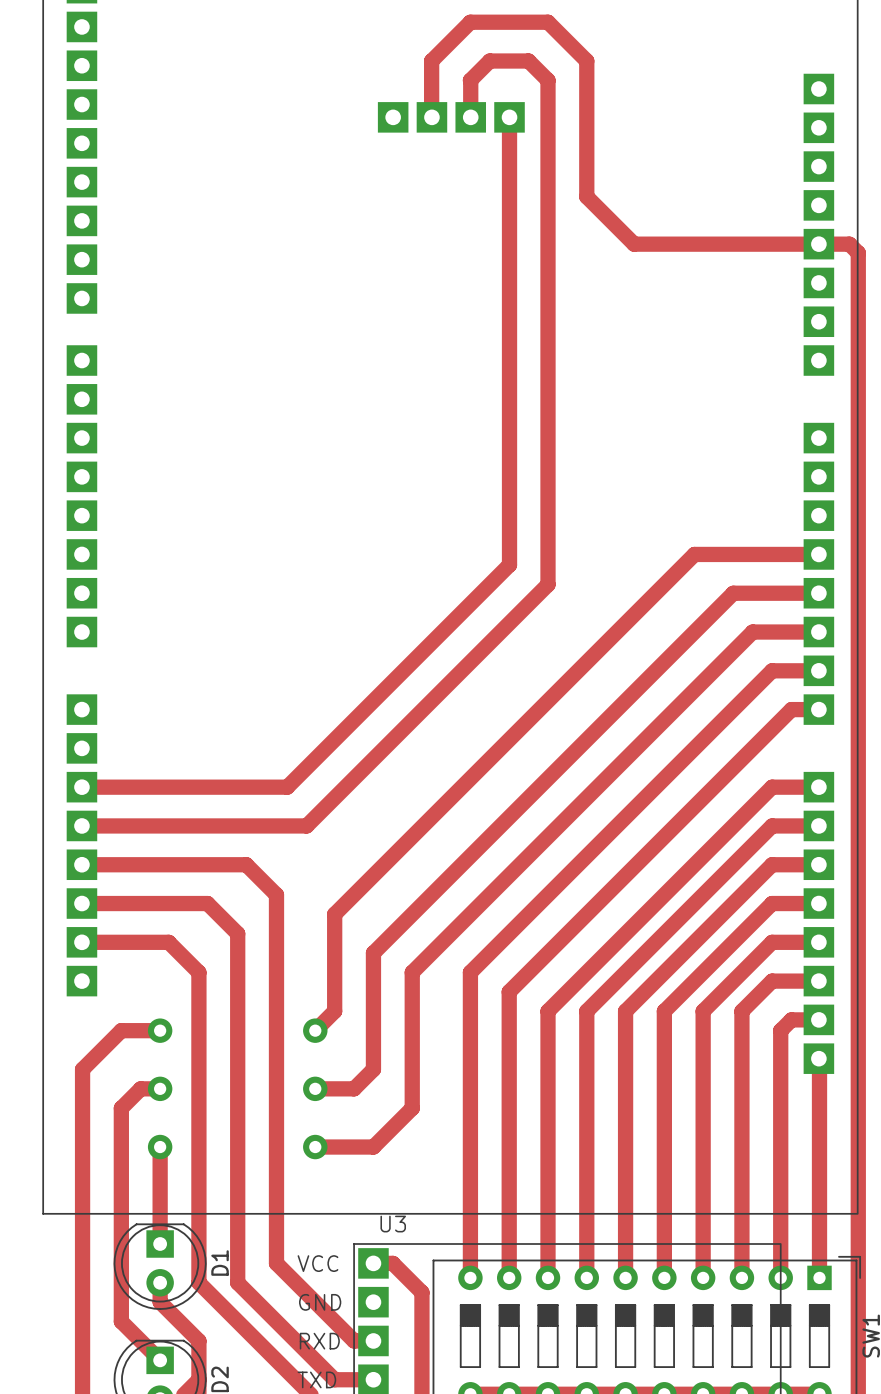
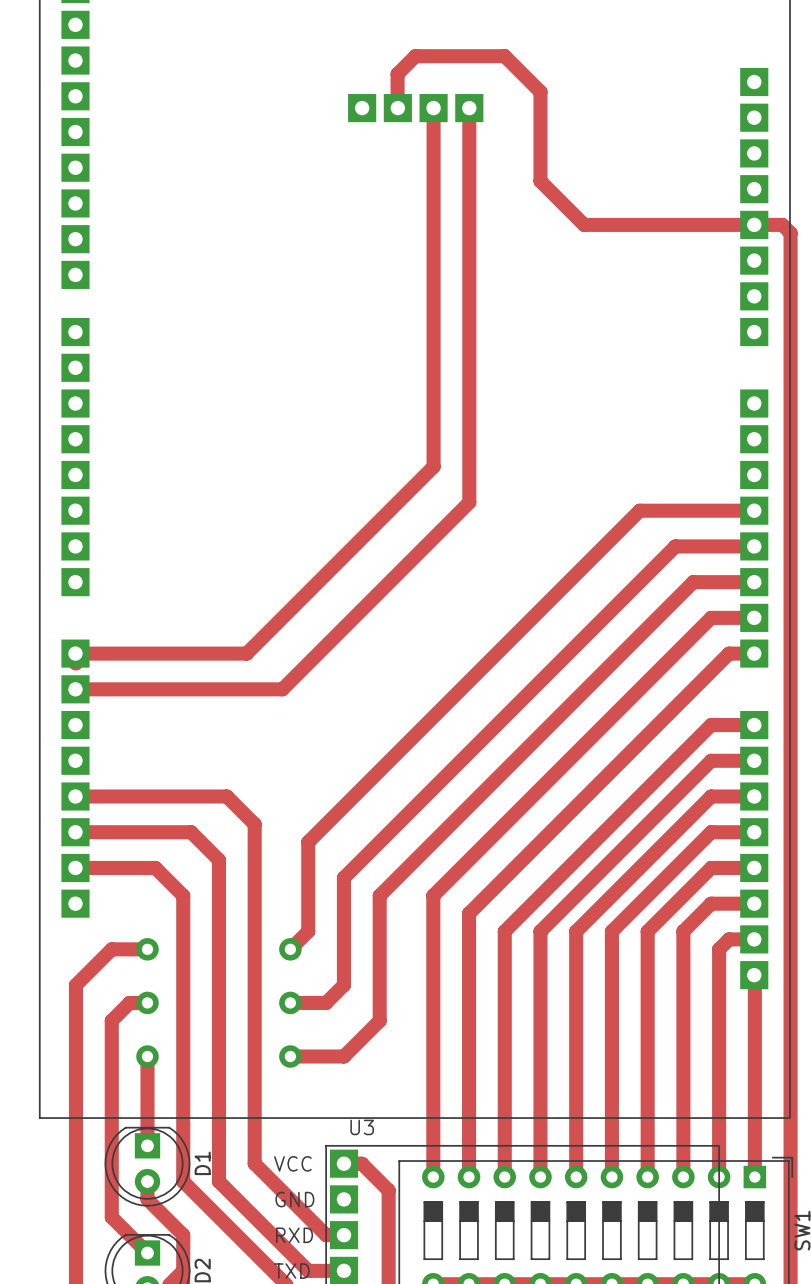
track: (489, 61) (470, 80) (470, 117) -> (451, 56) (415, 56) (397, 74)
track: (528, 61) (548, 80) (548, 584) (306, 825) (81, 825) -> none
track: (431, 80) (431, 61) (470, 22) (548, 22) (586, 61) (586, 99) -> (486, 56) (504, 56) (540, 91)
track: none -> (433, 108) (433, 466) (246, 653) (75, 653) (76, 663)
track: (509, 545) (509, 564) (287, 787) (81, 787) -> (469, 502) (282, 689) (75, 689)

